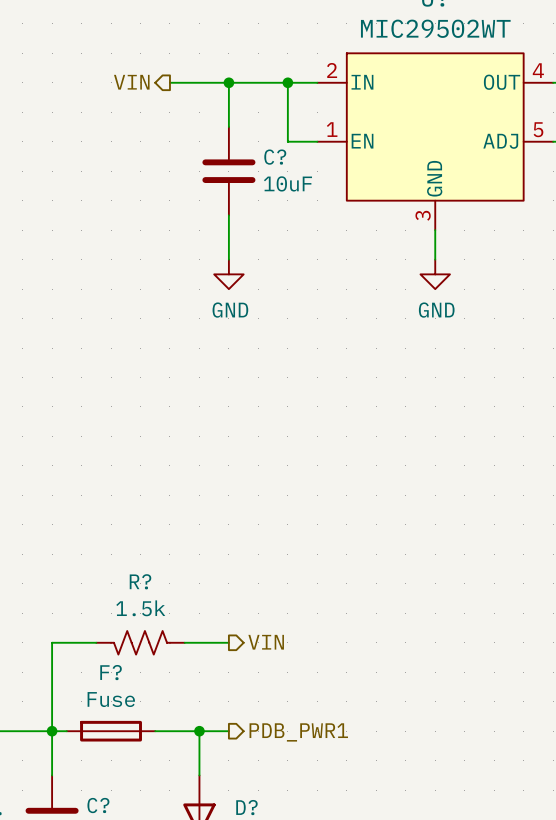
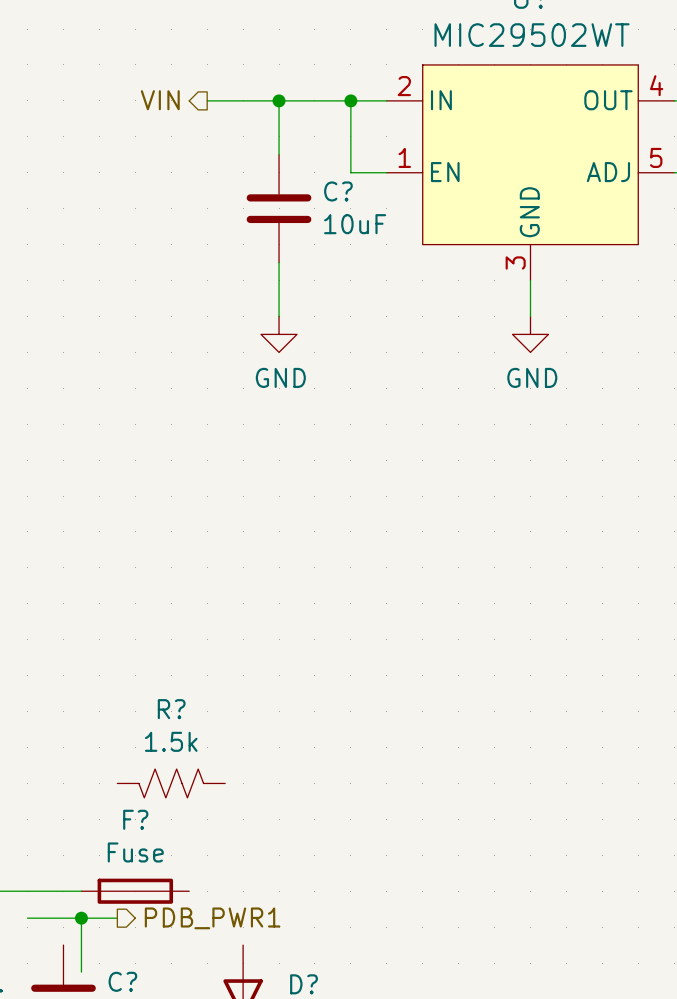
wire: (96, 642) (52, 642) (52, 775) -> none
wire: (184, 642) (228, 642) -> none
hierarchical label: VIN (266, 642) -> none
junction position: (52, 731) -> (81, 918)
wire: (155, 731) (228, 731) -> (27, 918) (117, 918)
wire: (199, 731) (199, 775) -> (81, 918) (81, 972)
junction: (199, 731) -> none
hierarchical label position: PDB_PWR1 (298, 732) -> PDB_PWR1 (212, 918)

